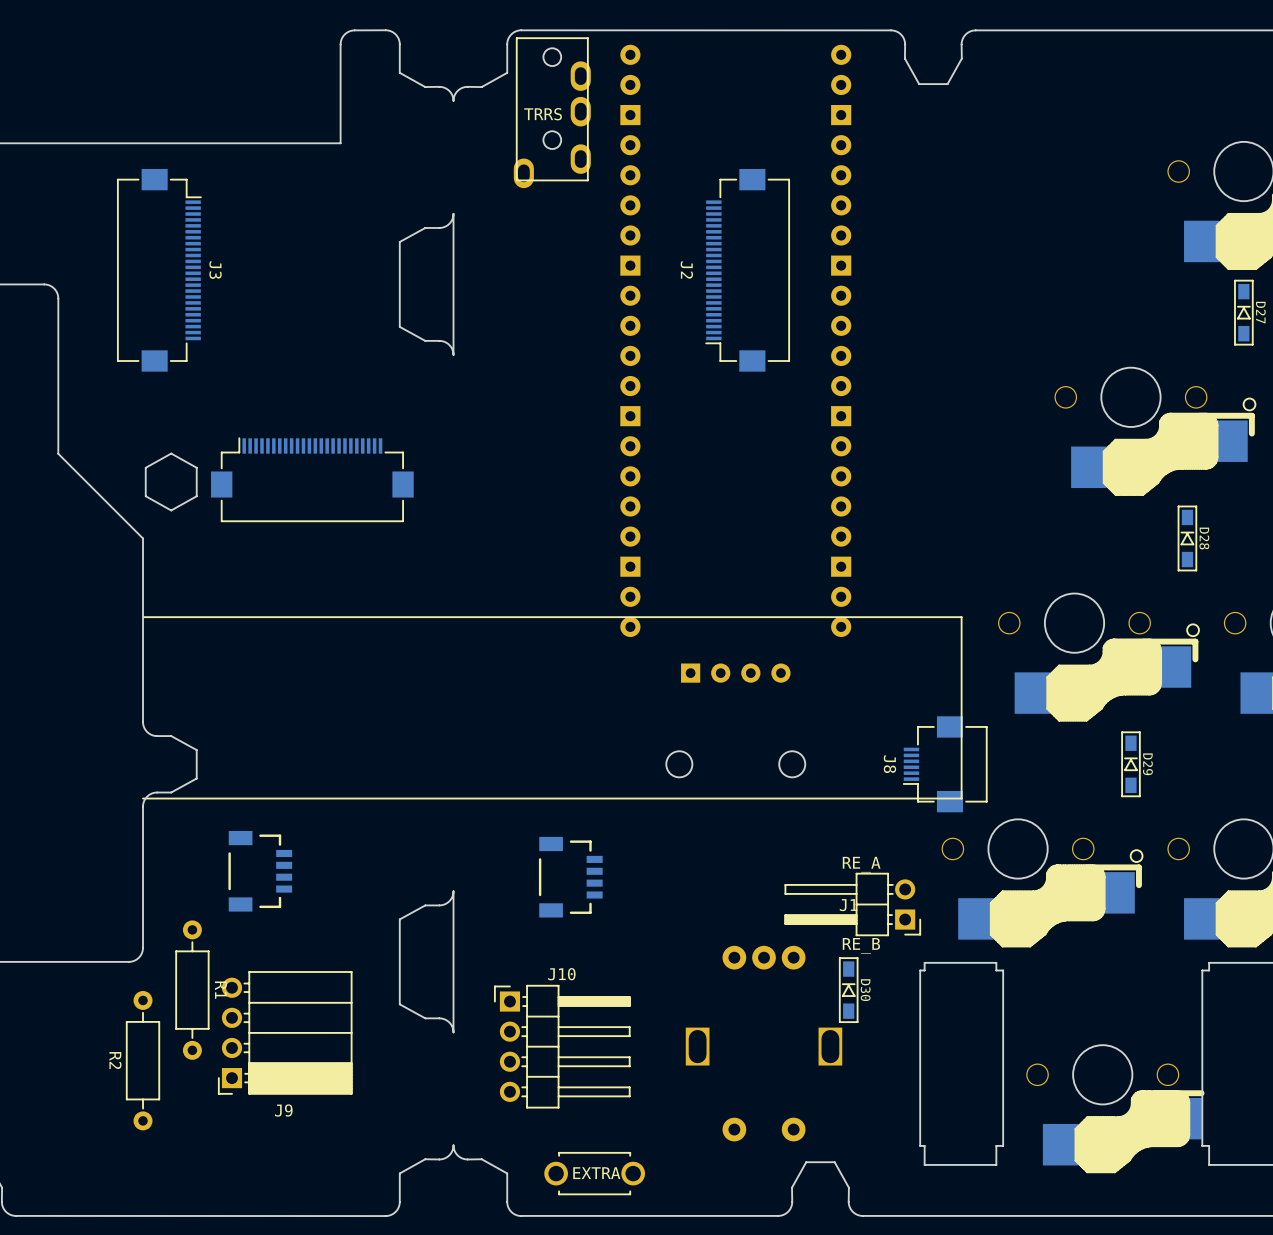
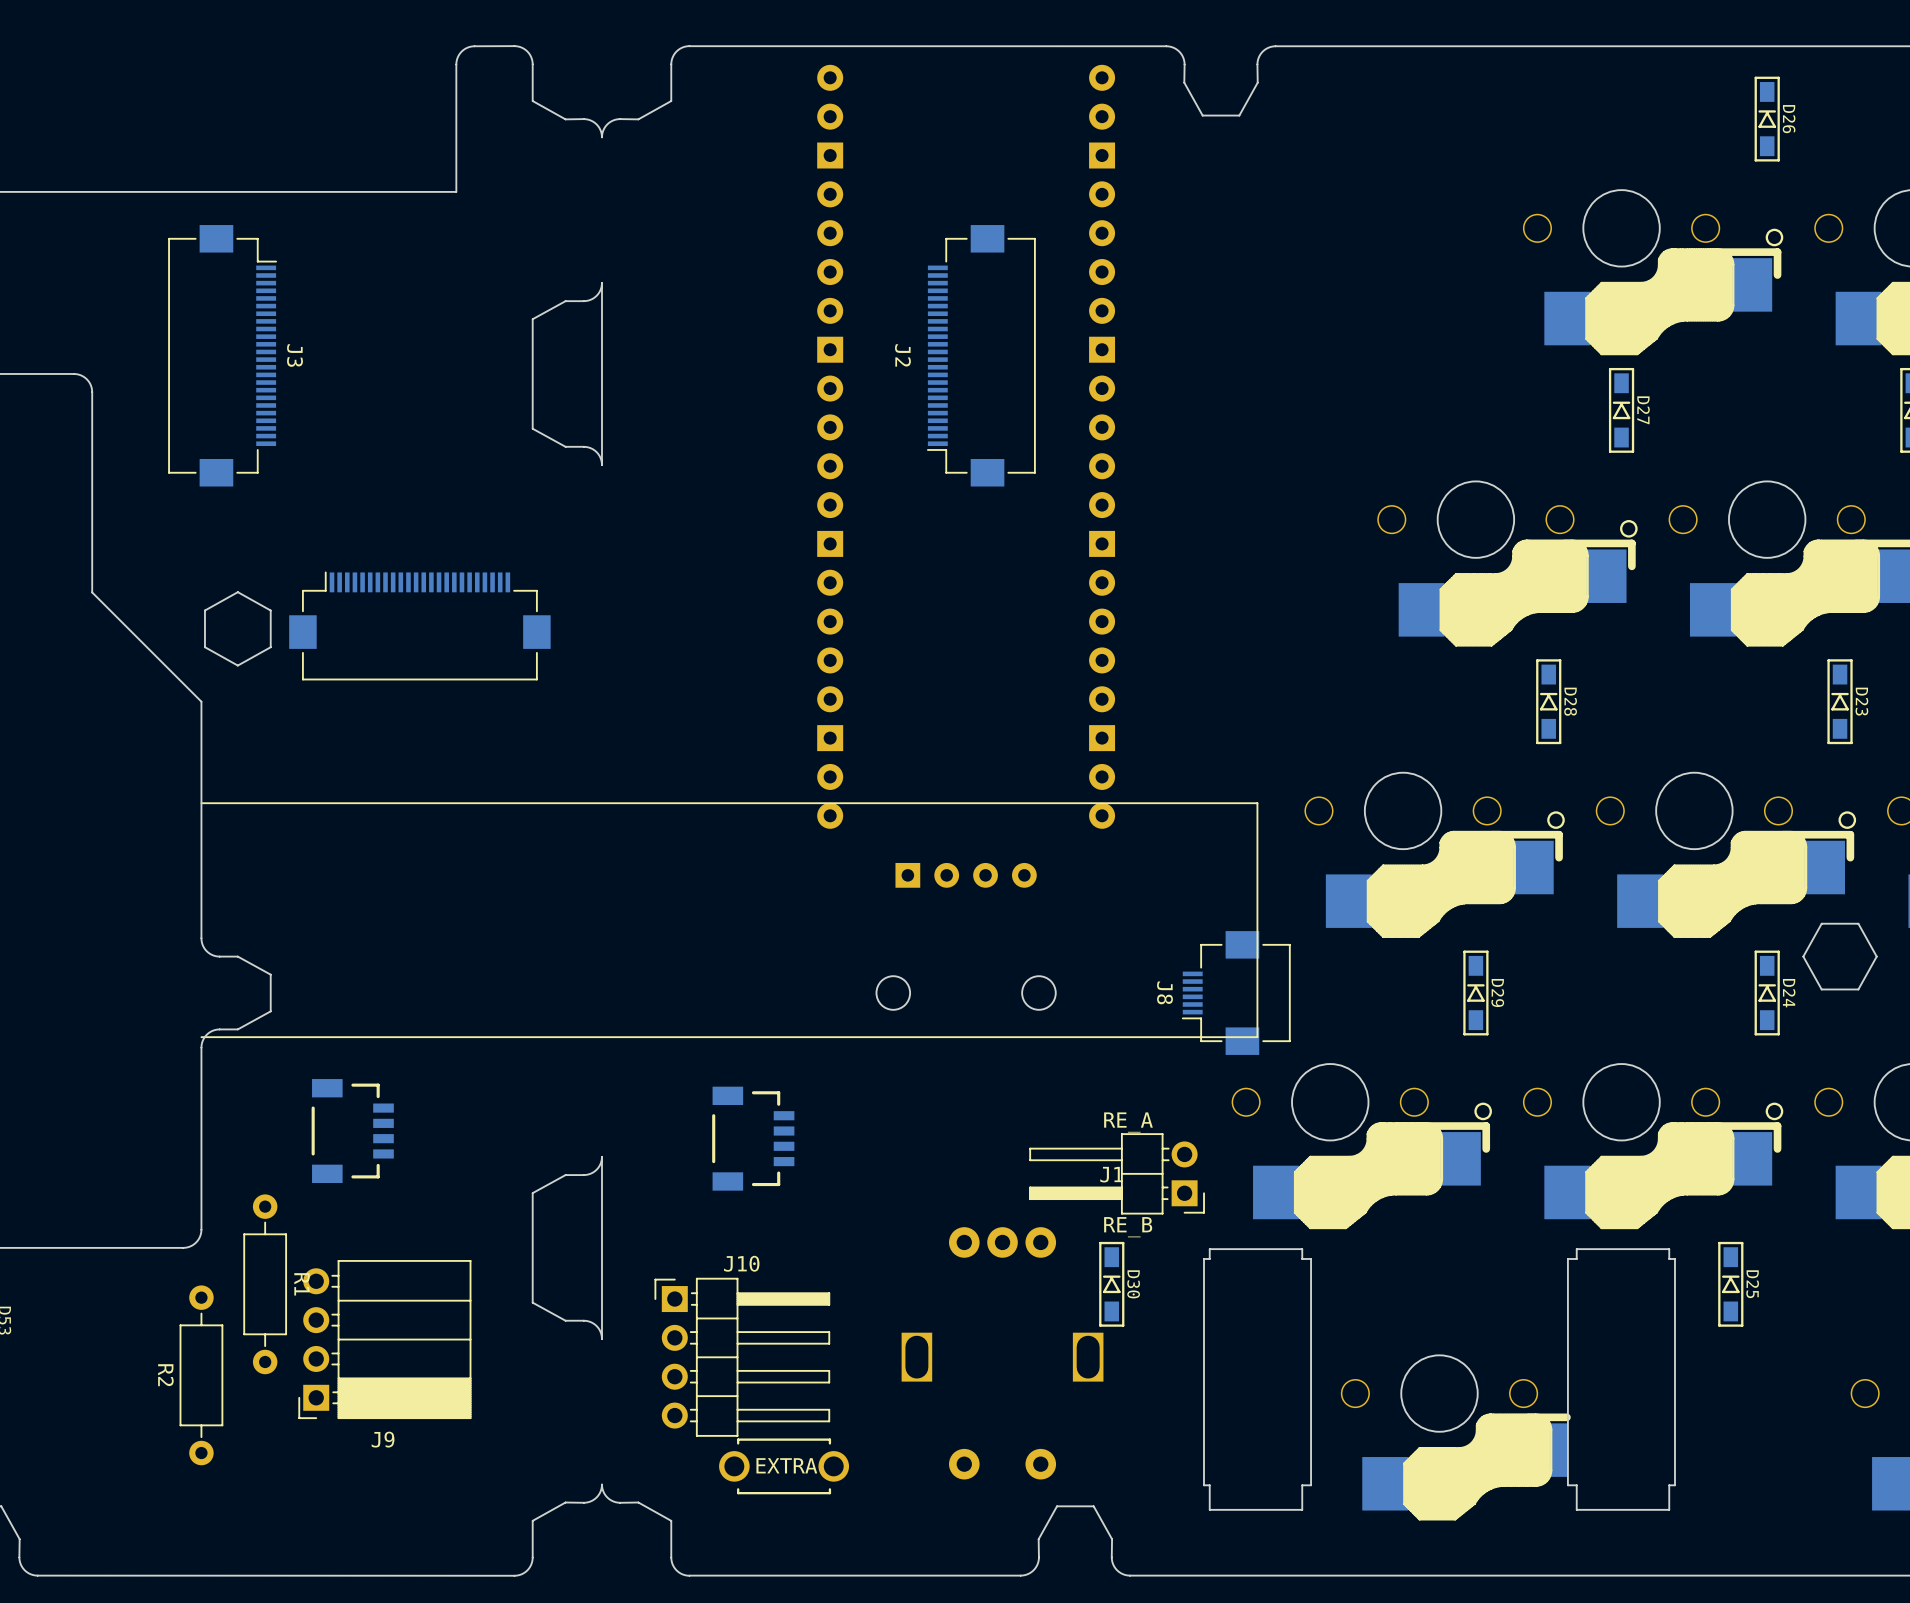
part: (552, 112) -> none
part position: (594, 1173) -> (784, 1466)

